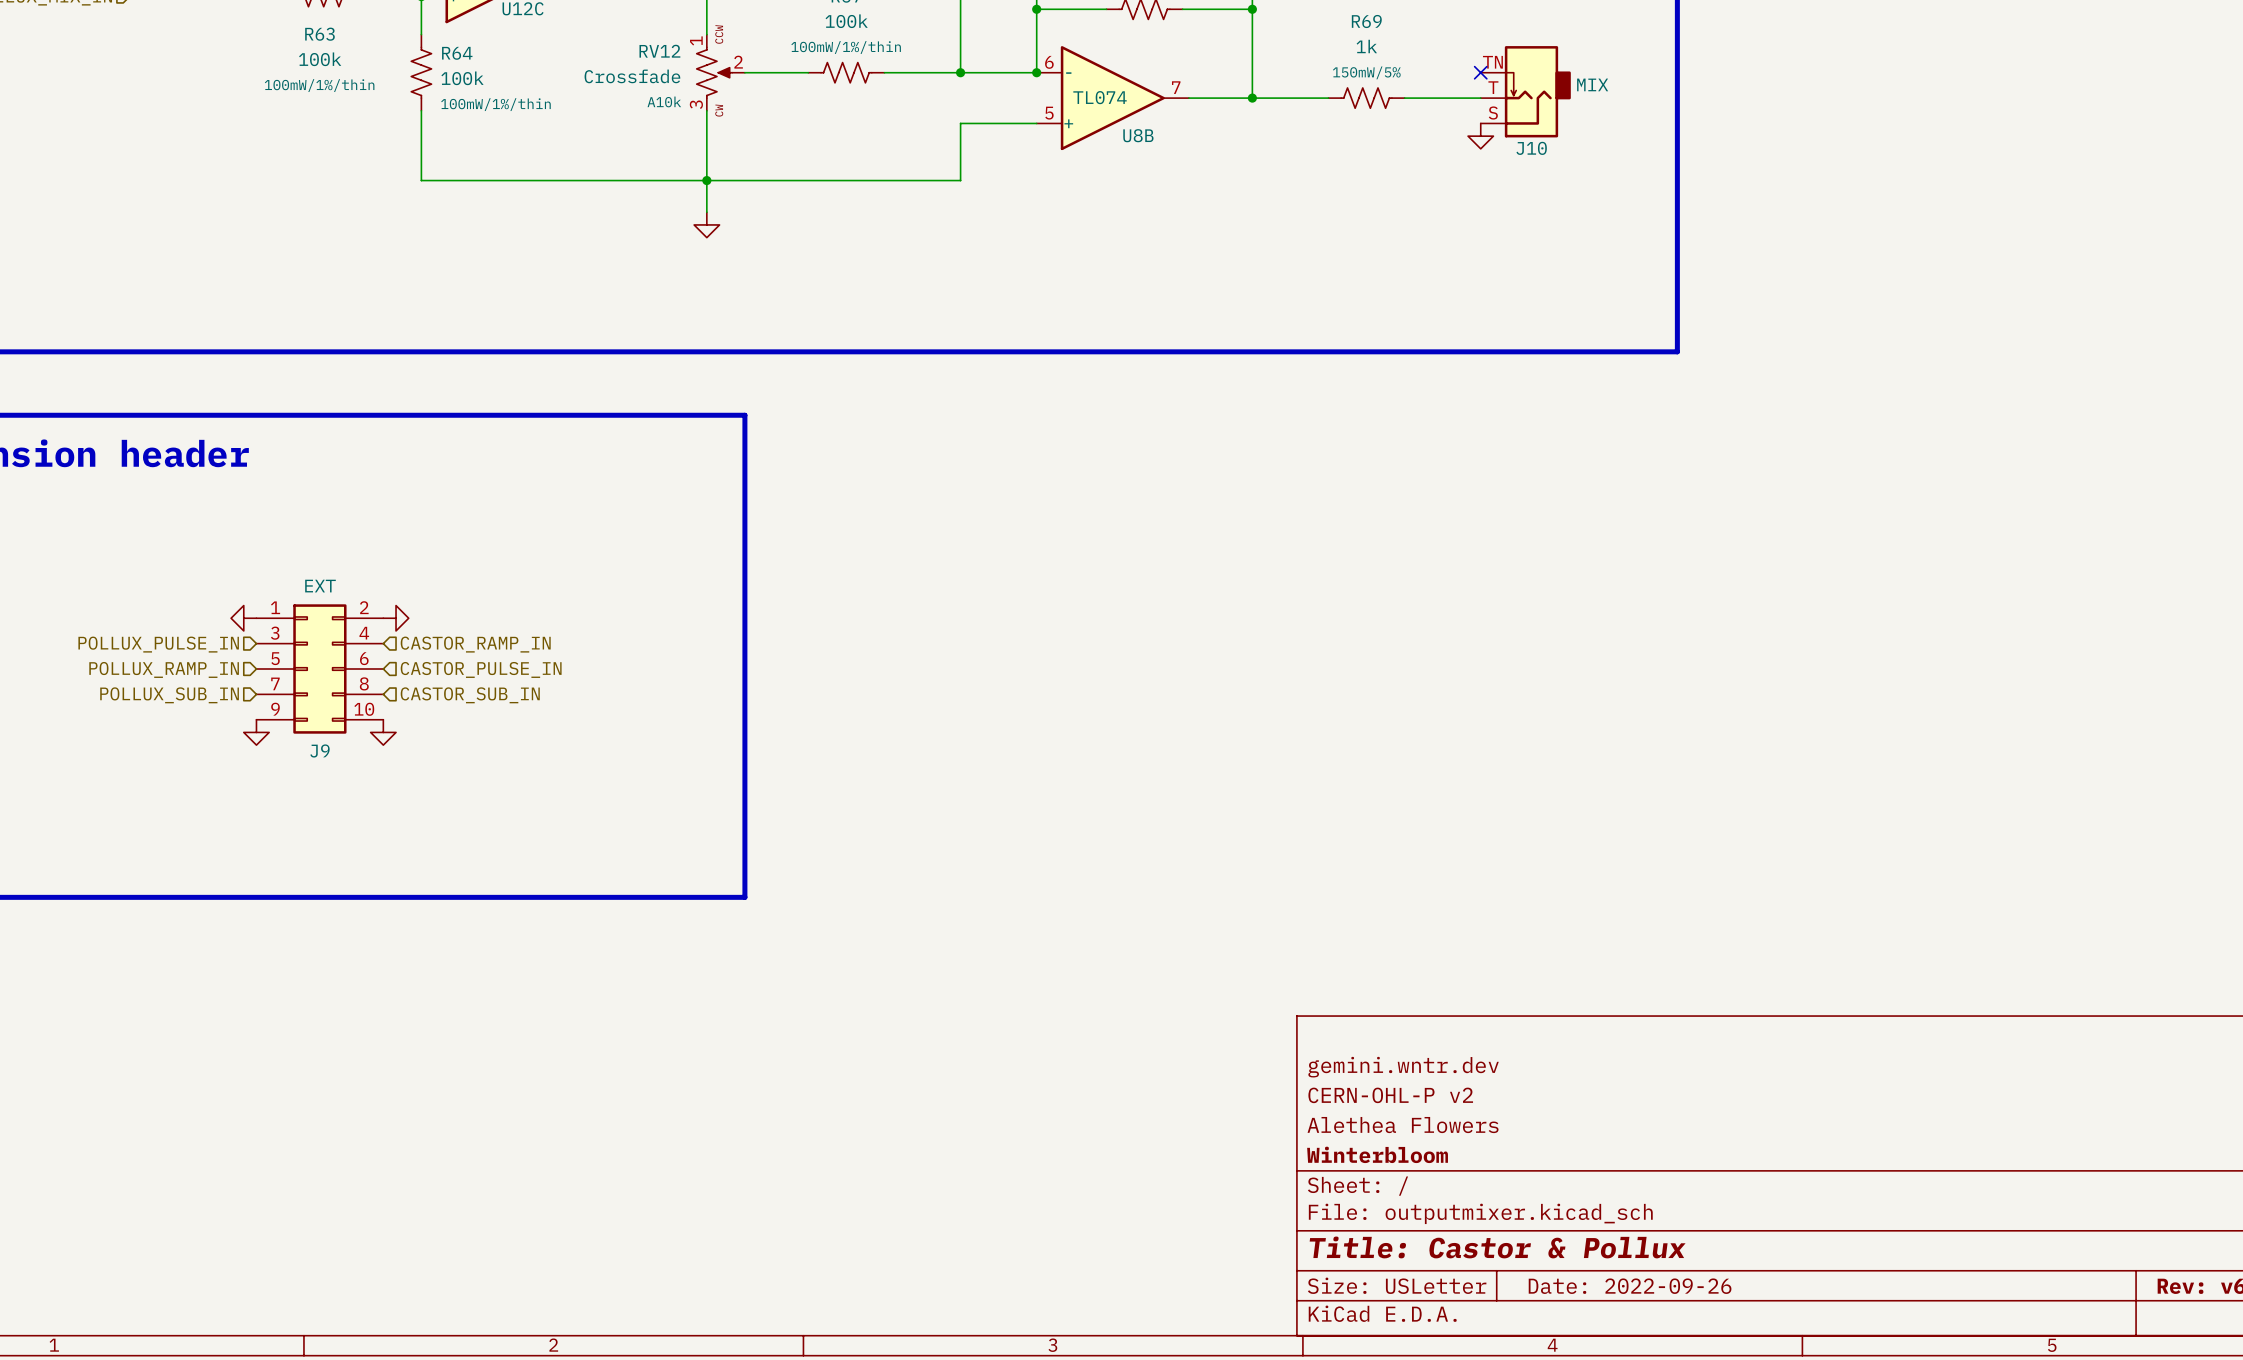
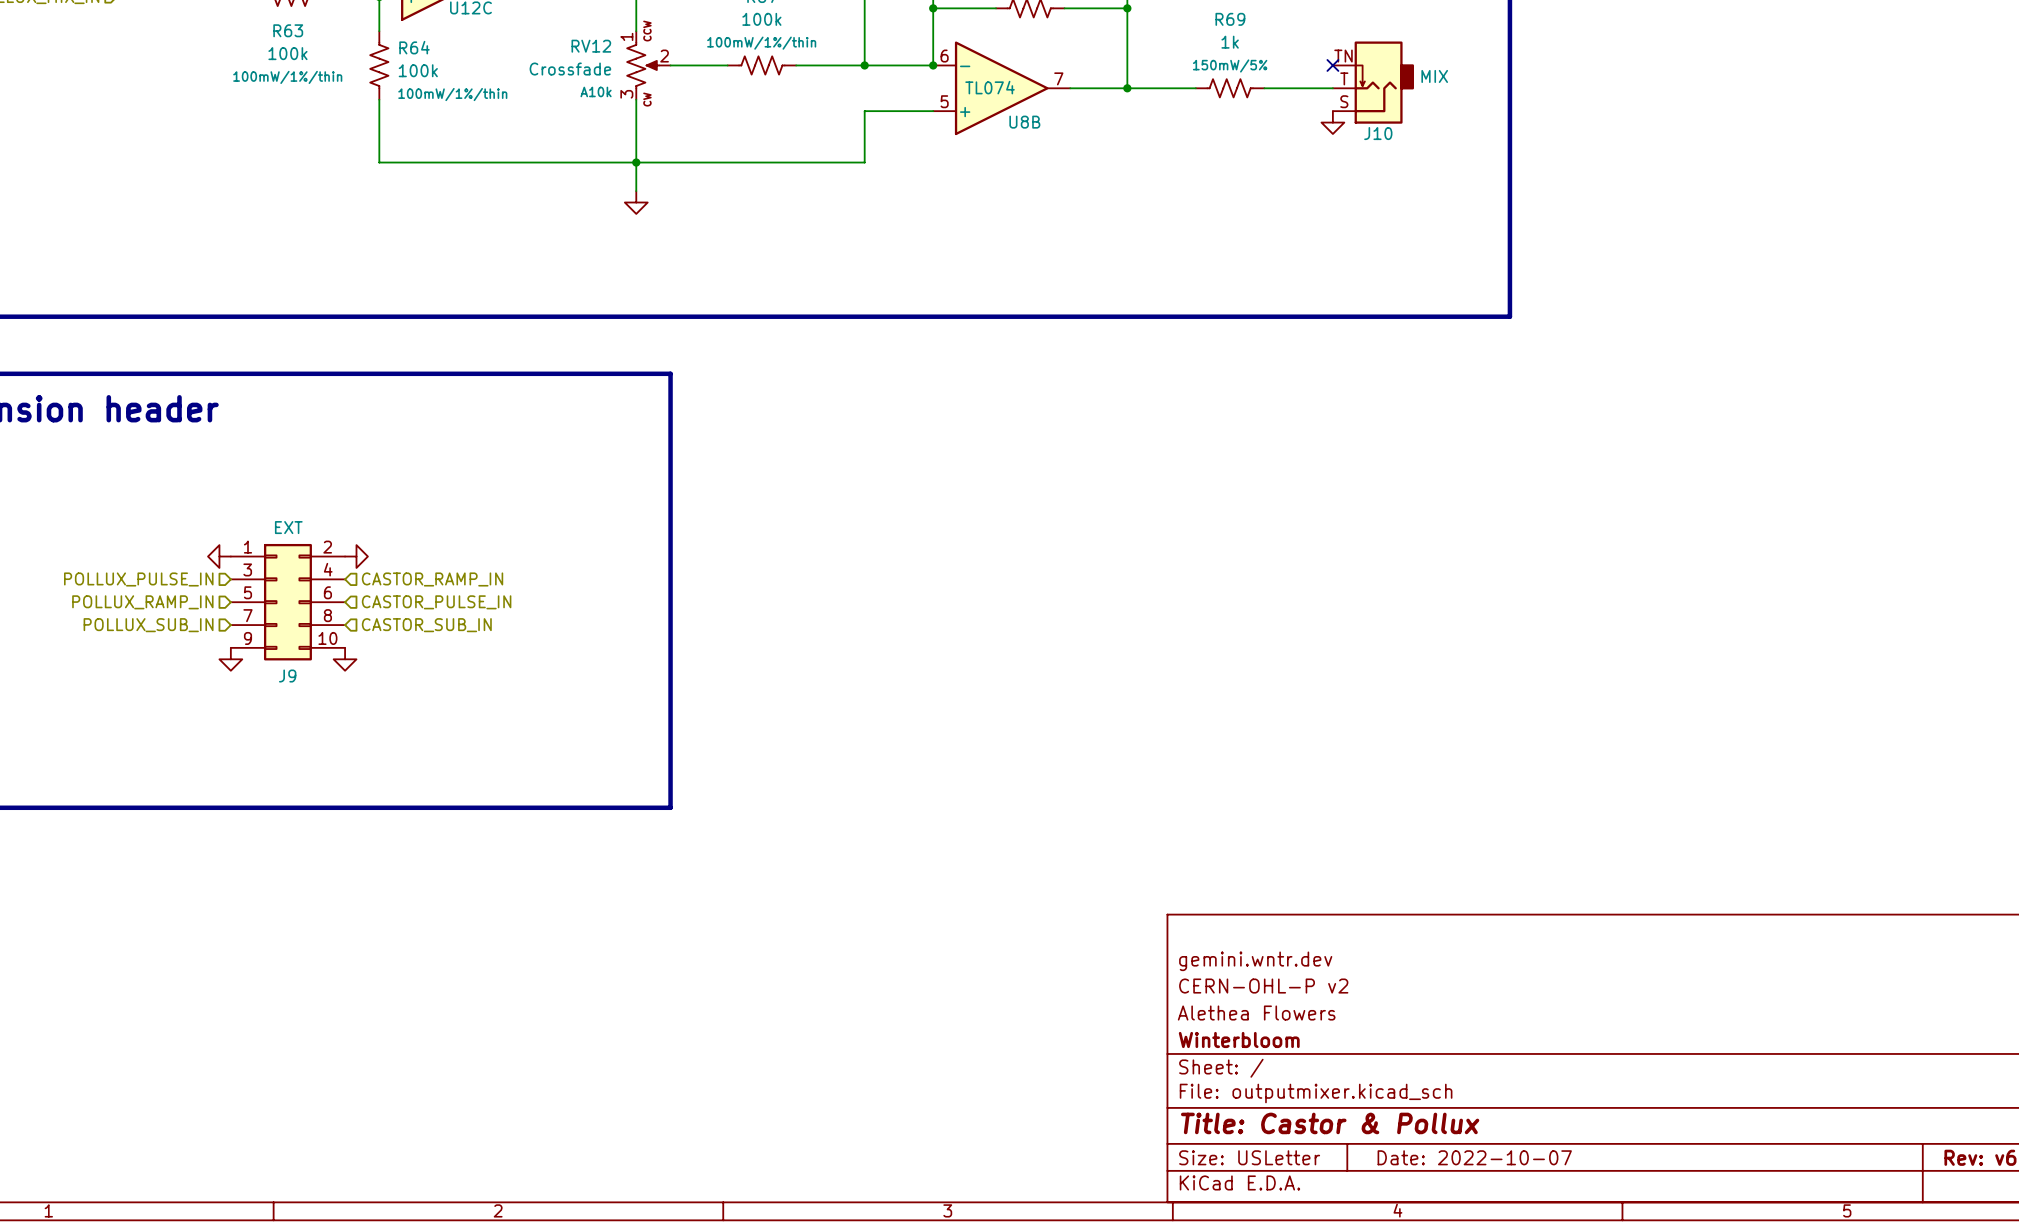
title block: Date: 2022-09-26 (1630, 1286) -> Date: 2022-10-07 (1474, 1157)

